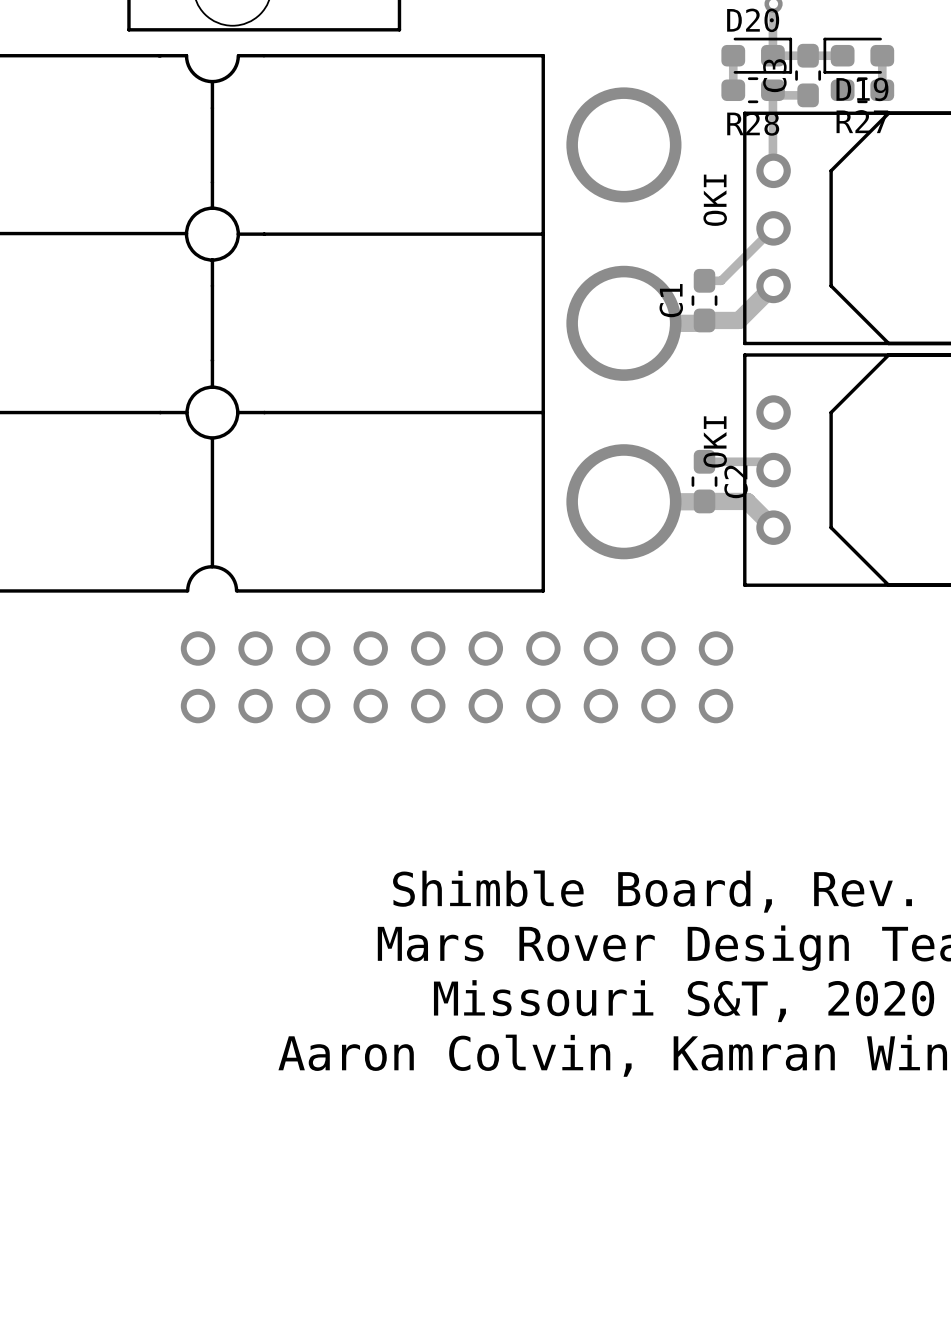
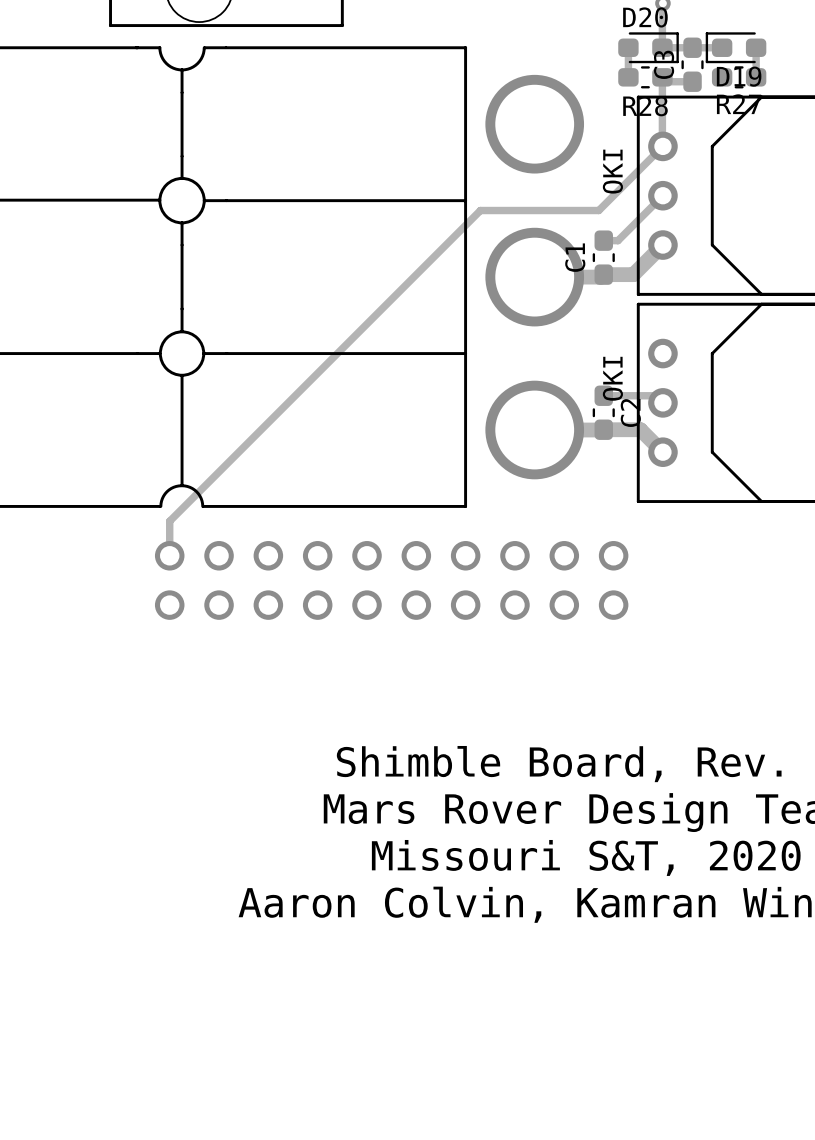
track: none -> (662, 146) (598, 210) (480, 210) (169, 521) (169, 555)

